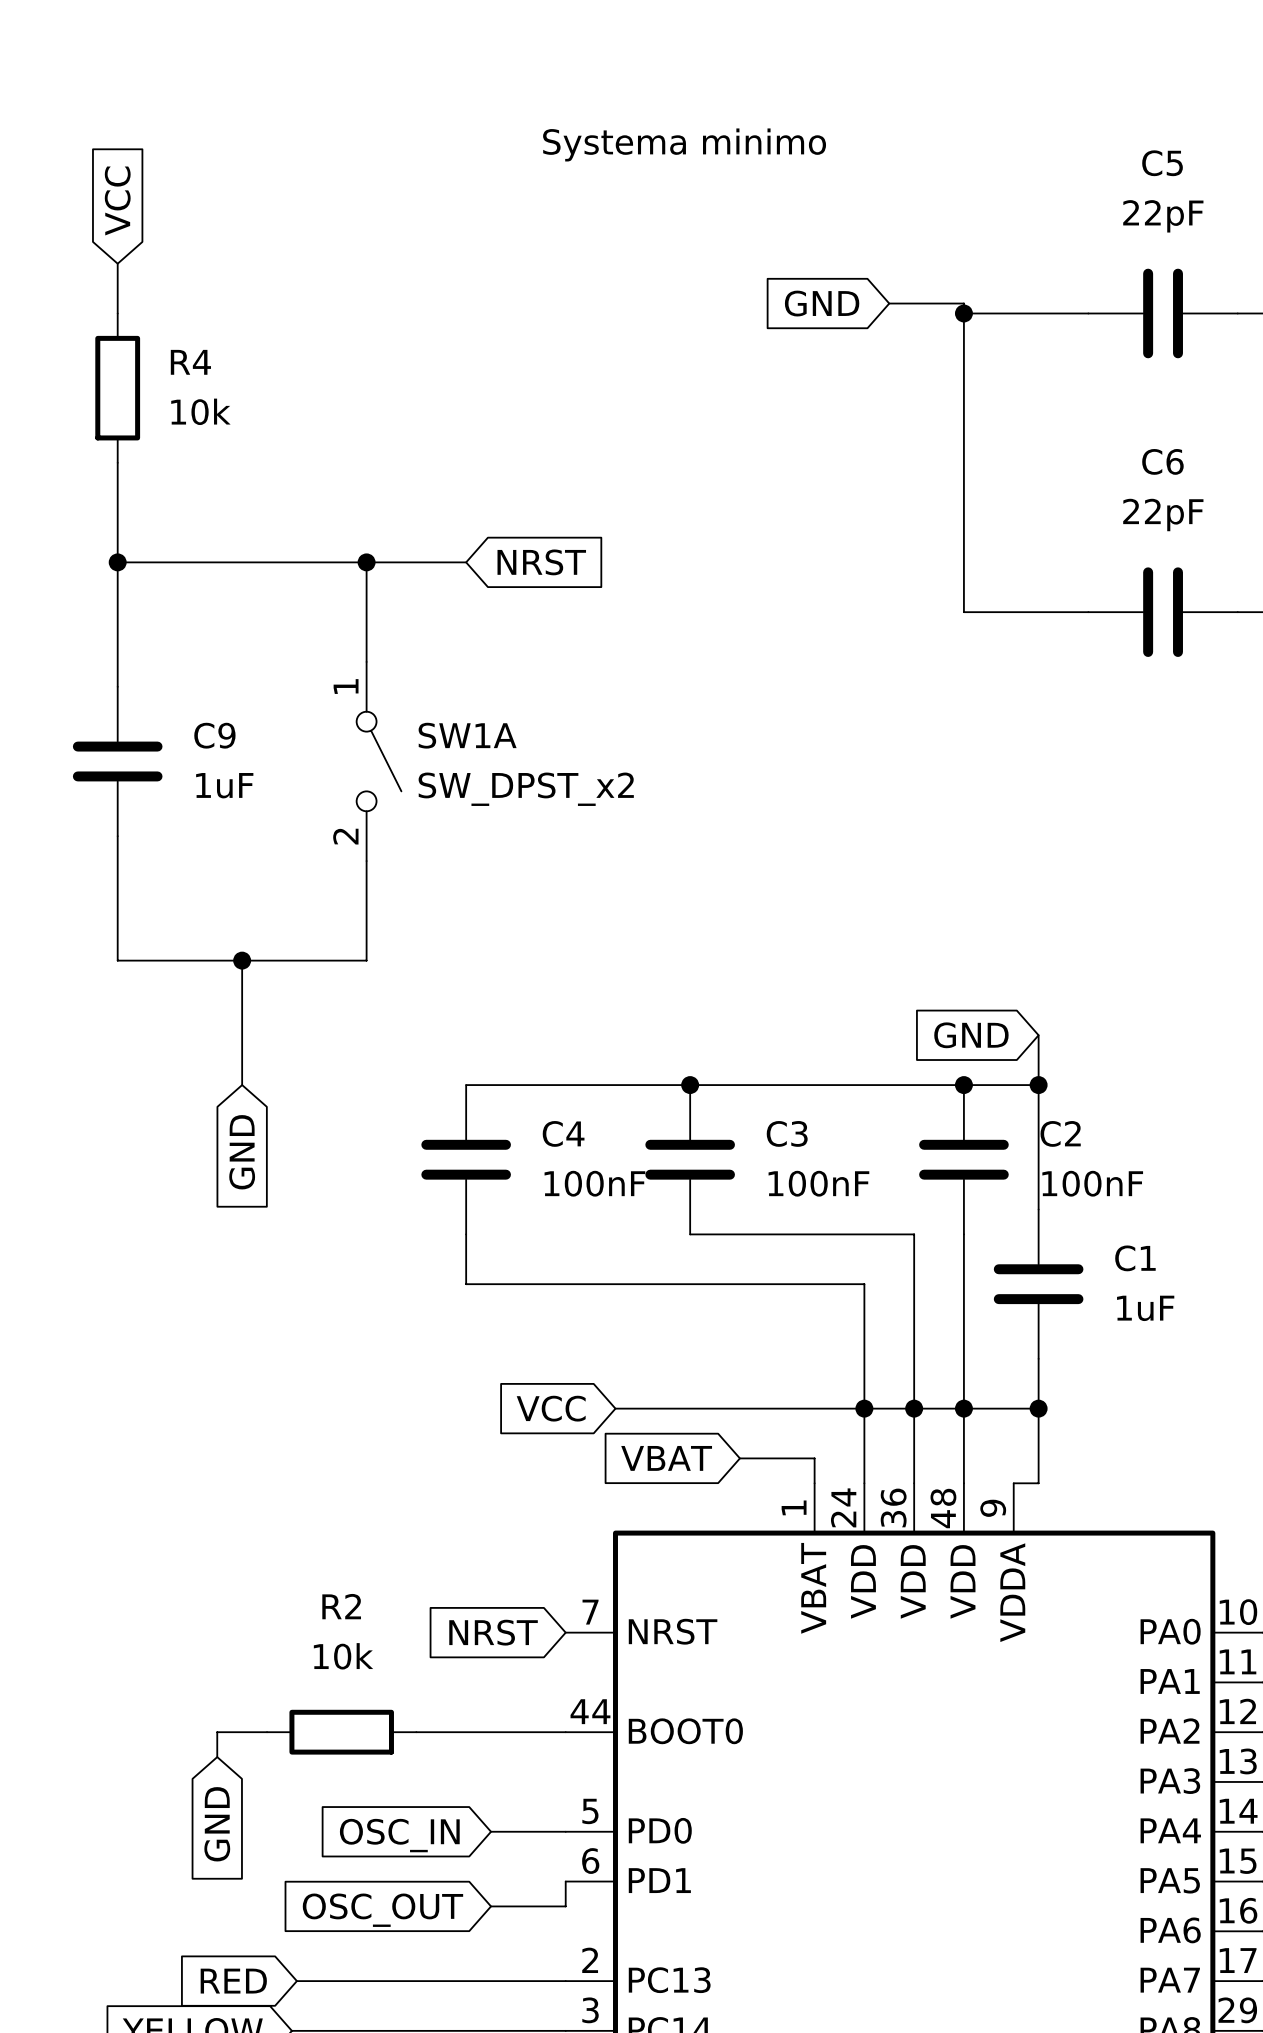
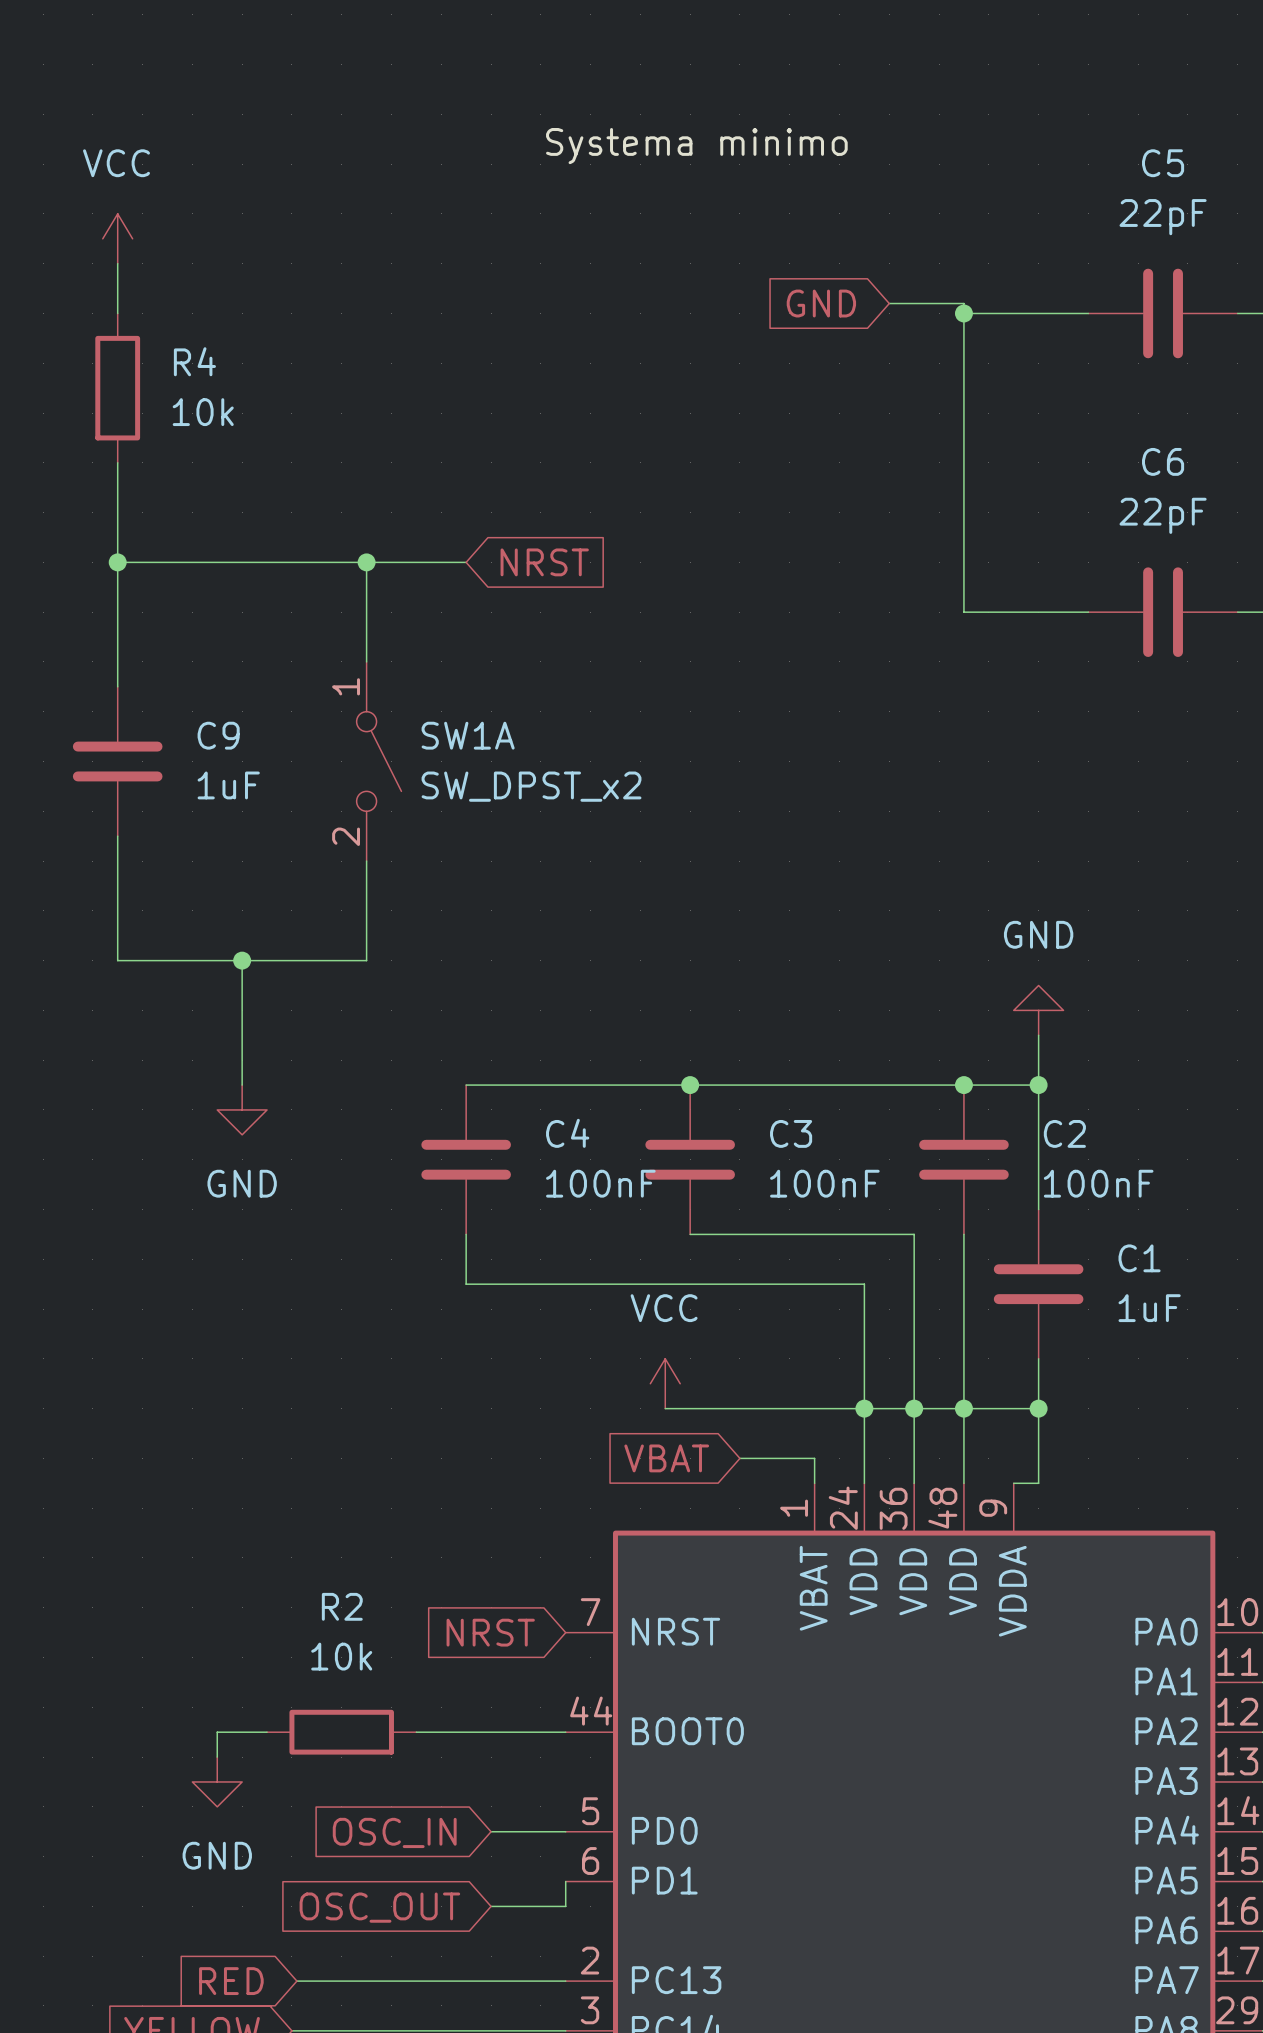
global label: VCC (117, 200) -> none
power symbol: none -> VCC (117, 238)
power symbol: none -> GND (1038, 1010)
global label: GND (971, 1035) -> none
power symbol: none -> GND (242, 1109)
global label: GND (242, 1152) -> none
power symbol: none -> VCC (665, 1383)
global label: VCC (551, 1408) -> none
wire: (615, 1408) (665, 1408) -> none
power symbol: none -> GND (217, 1781)
global label: GND (217, 1824) -> none

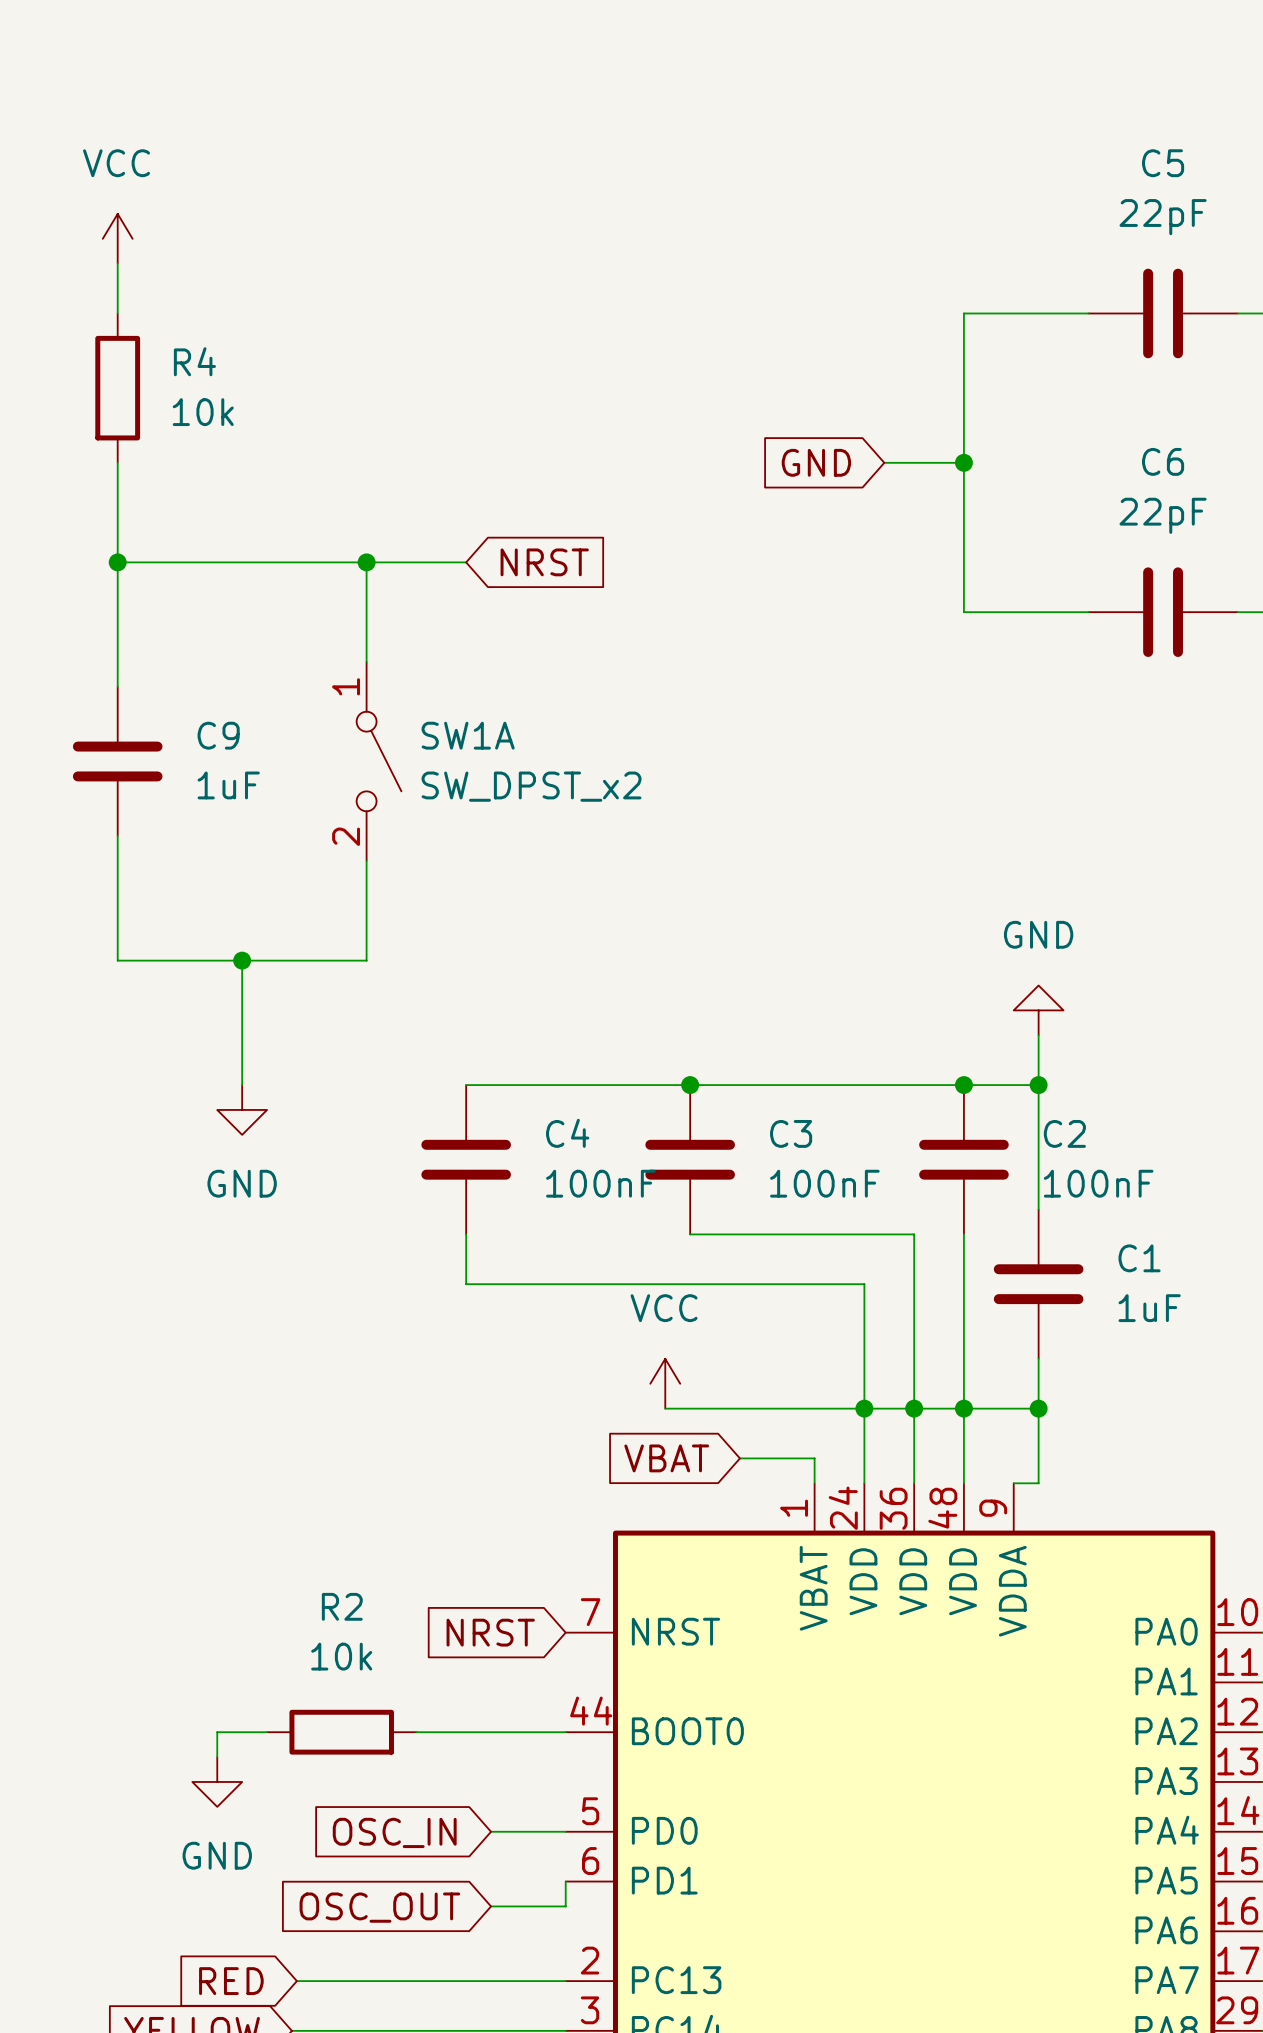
label: Systema minimo (696, 146) -> none
global label position: GND (821, 303) -> GND (816, 462)
wire: (889, 303) (963, 303) (963, 313) -> none
junction: (963, 313) -> none
wire: none -> (884, 462) (963, 462)
junction: none -> (963, 462)

